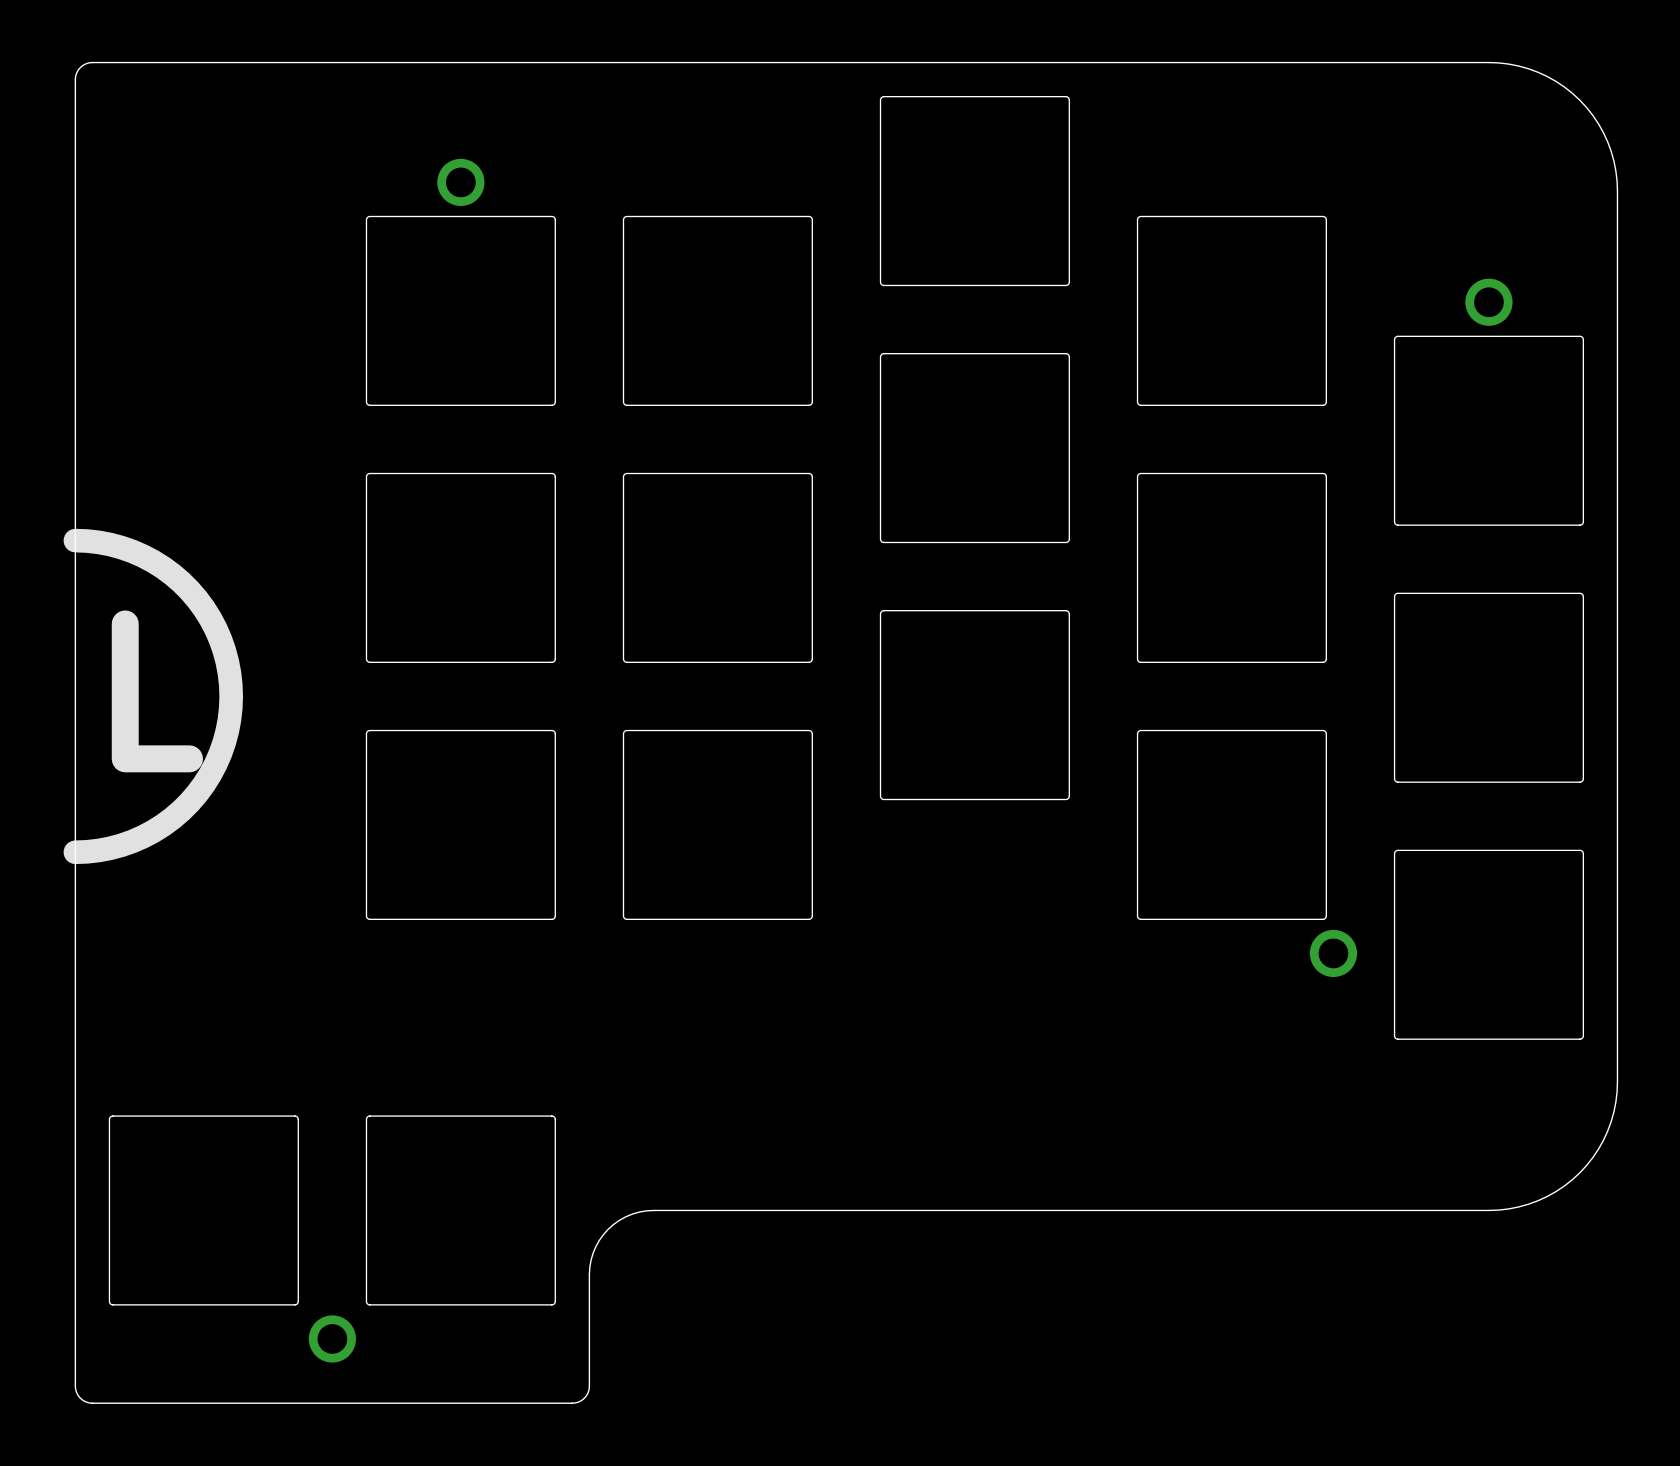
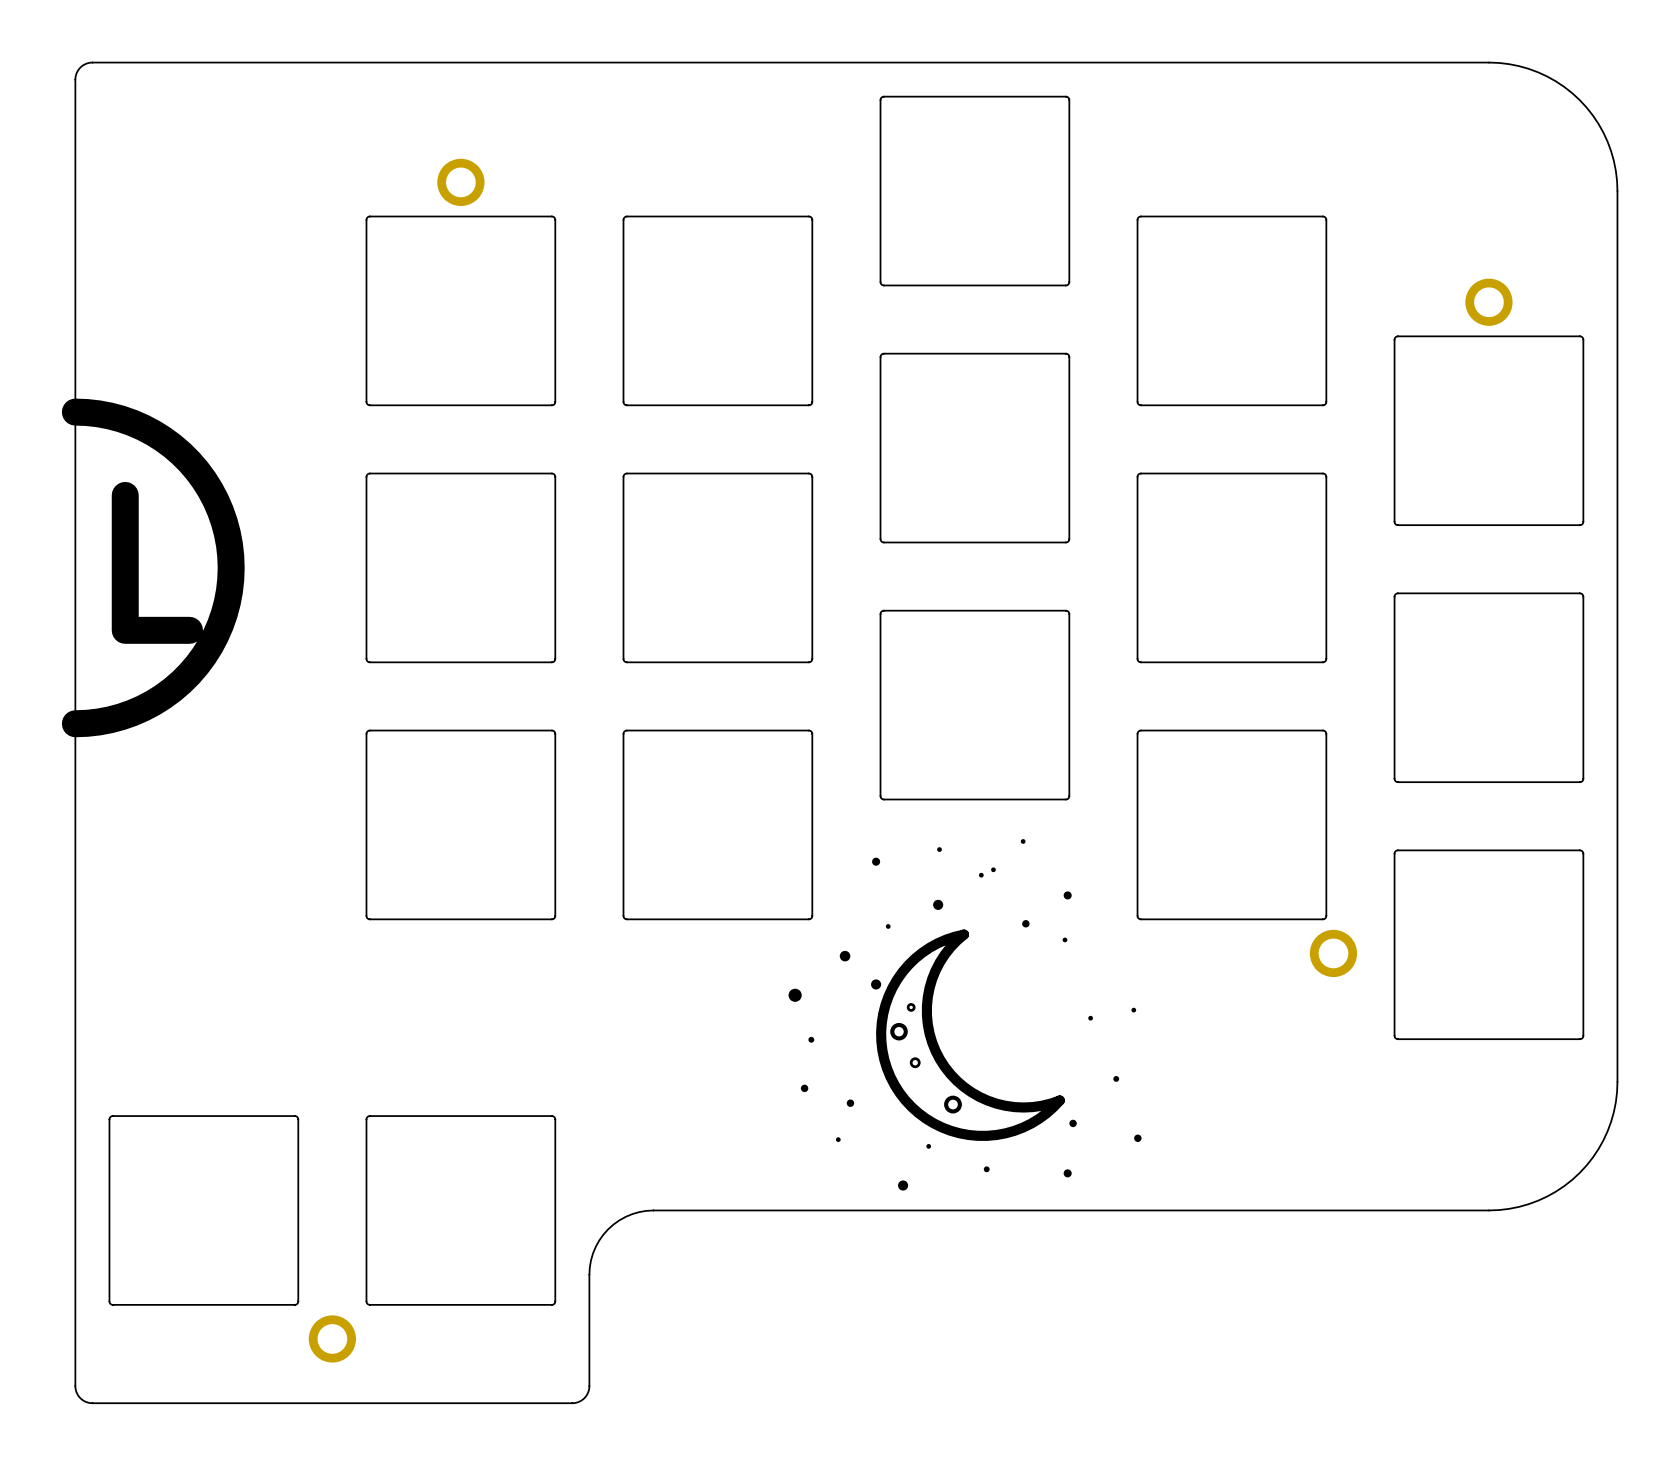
line: (75, 540) (98, 542) (132, 551) (163, 567) (189, 590) (210, 618) (220, 639) (229, 673) (231, 696) (229, 719) (220, 753) (210, 774) (189, 802) (172, 818) (142, 836) (110, 848) (75, 852) -> (75, 412) (98, 413) (132, 422) (163, 439) (181, 453) (197, 470) (215, 500) (227, 533) (231, 567) (227, 602) (215, 635) (197, 665) (181, 682) (153, 702) (132, 712) (98, 722) (75, 723)
text position: L (157, 691) -> L (157, 562)
drawing: none -> [1020, 839, 1026, 844]
drawing: none -> [937, 847, 942, 852]
drawing: none -> [872, 857, 881, 866]
drawing: none -> [978, 867, 996, 878]
drawing: none -> [1063, 891, 1072, 900]
drawing: none -> [933, 899, 944, 910]
drawing: none -> [1022, 920, 1030, 928]
drawing: none -> [885, 924, 891, 929]
line: none -> (963, 934) (937, 943) (922, 952) (908, 965) (897, 979) (888, 996) (883, 1013) (881, 1041) (884, 1059) (890, 1076) (899, 1092) (911, 1106) (925, 1118) (950, 1130) (968, 1134) (987, 1135) (1005, 1133) (1022, 1127) (1039, 1118) (1059, 1100) (1042, 1105) (1023, 1107) (1005, 1105) (987, 1100) (963, 1086) (950, 1074) (939, 1059) (932, 1042) (927, 1024) (926, 1006) (929, 987) (939, 962) (950, 947) (963, 934)
drawing: none -> [1062, 937, 1068, 943]
drawing: none -> [839, 950, 851, 962]
drawing: none -> [871, 979, 882, 990]
drawing: none -> [788, 988, 802, 1002]
drawing: none -> [890, 1003, 916, 1041]
drawing: none -> [1131, 1007, 1137, 1013]
drawing: none -> [1088, 1015, 1093, 1021]
drawing: none -> [808, 1036, 815, 1043]
drawing: none -> [909, 1057, 921, 1069]
drawing: none -> [1113, 1076, 1120, 1082]
drawing: none -> [800, 1084, 809, 1093]
drawing: none -> [944, 1095, 962, 1114]
drawing: none -> [846, 1099, 855, 1107]
drawing: none -> [1069, 1119, 1077, 1128]
drawing: none -> [1134, 1134, 1142, 1142]
drawing: none -> [835, 1137, 841, 1142]
drawing: none -> [926, 1144, 932, 1149]
drawing: none -> [983, 1166, 990, 1173]
drawing: none -> [1063, 1169, 1072, 1178]
drawing: none -> [898, 1180, 909, 1191]

